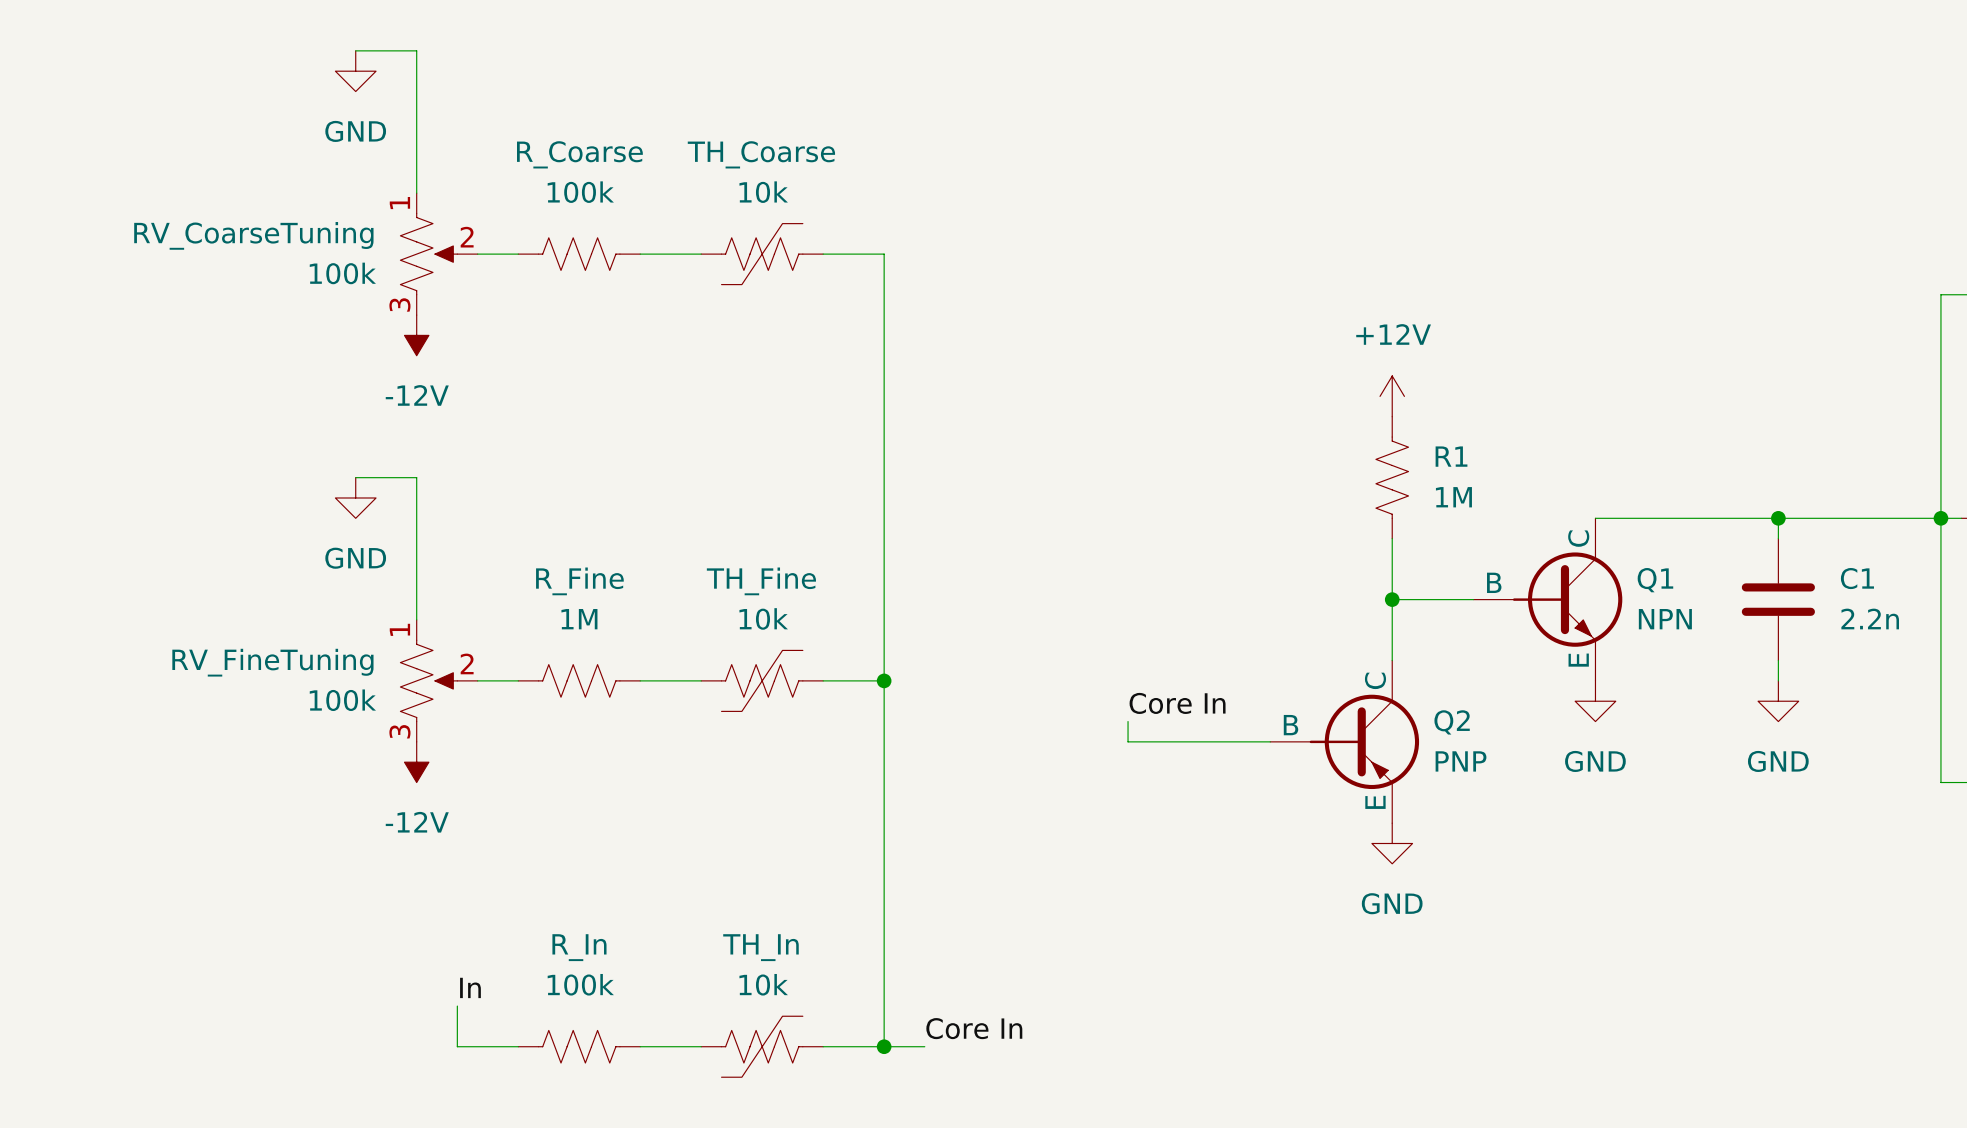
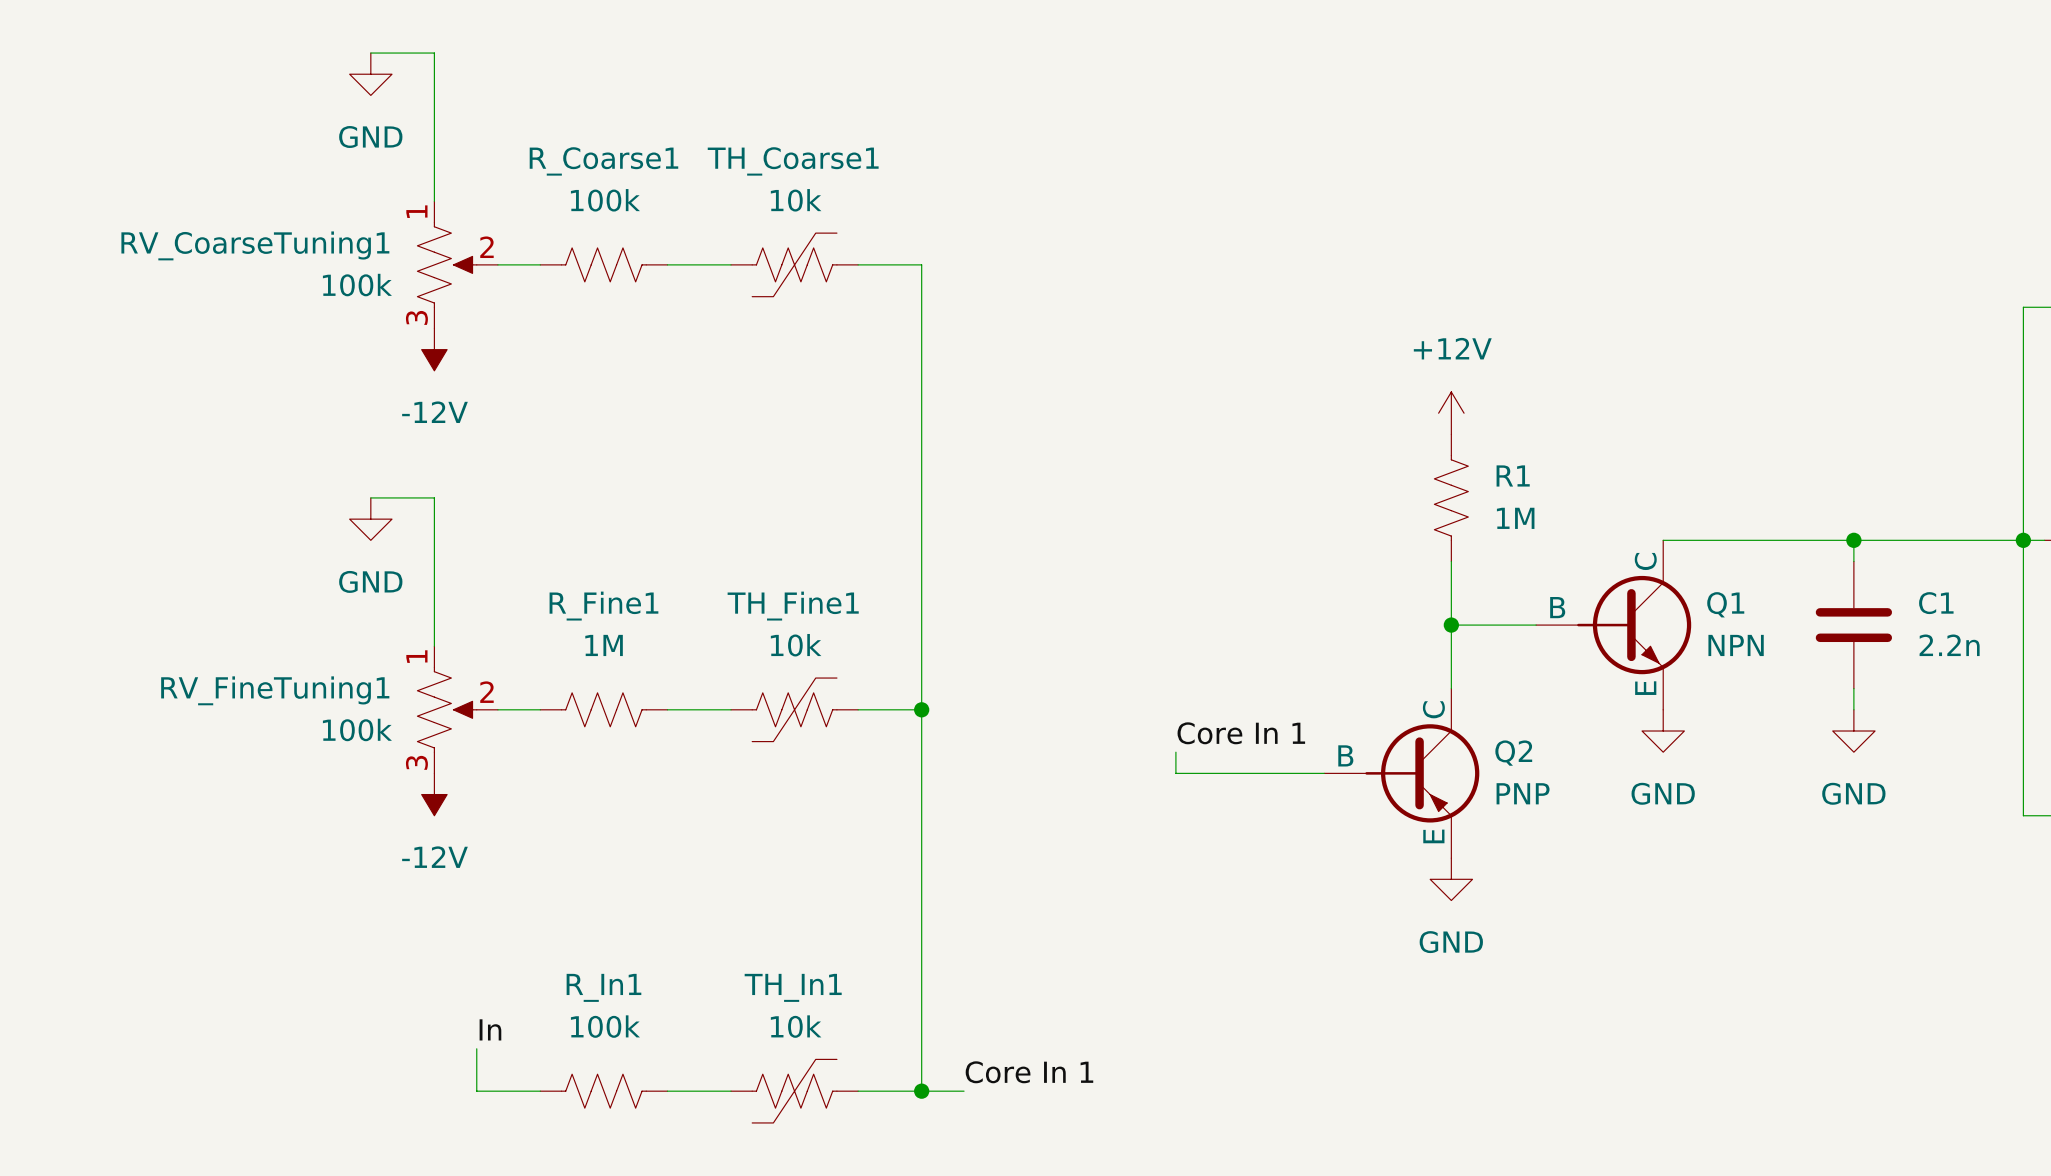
R_Coarse name: R_Coarse (579, 154) -> R_Coarse1 (603, 161)
TH_Coarse name: TH_Coarse (761, 154) -> TH_Coarse1 (793, 161)
RV_CoarseTuning name: RV_CoarseTuning (253, 235) -> RV_CoarseTuning1 (255, 245)
R_Fine name: R_Fine (579, 581) -> R_Fine1 (603, 606)
TH_Fine name: TH_Fine (761, 581) -> TH_Fine1 (793, 606)
RV_FineTuning name: RV_FineTuning (272, 662) -> RV_FineTuning1 (275, 690)
label: Core In (1177, 703) -> Core In 1 (1241, 733)
R_In name: R_In (579, 947) -> R_In1 (603, 987)
TH_In name: TH_In (760, 947) -> TH_In1 (793, 987)
label: Core In (974, 1028) -> Core In 1 (1029, 1072)

